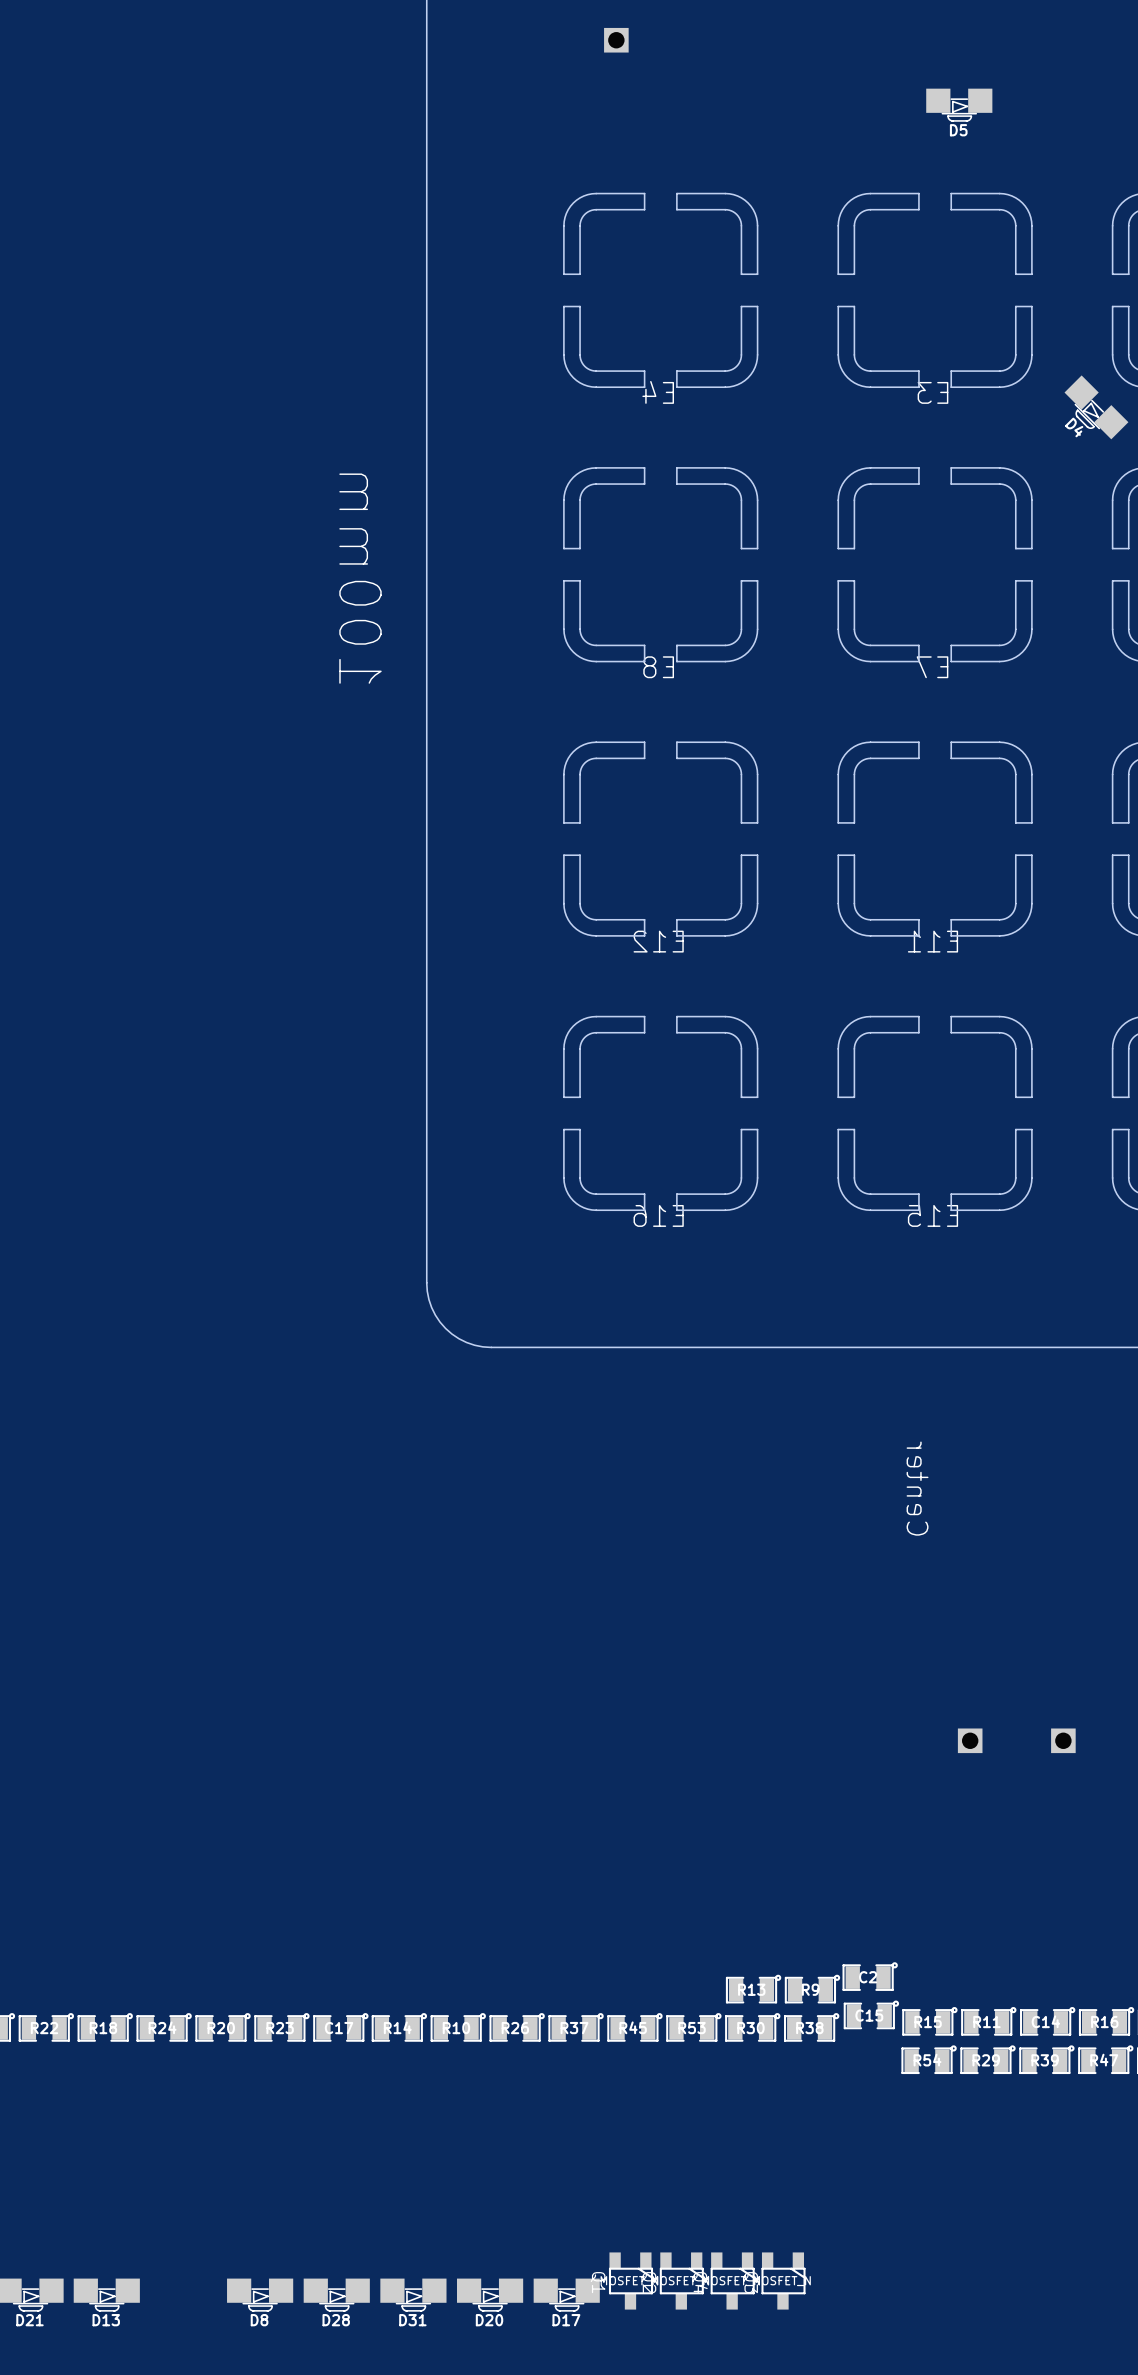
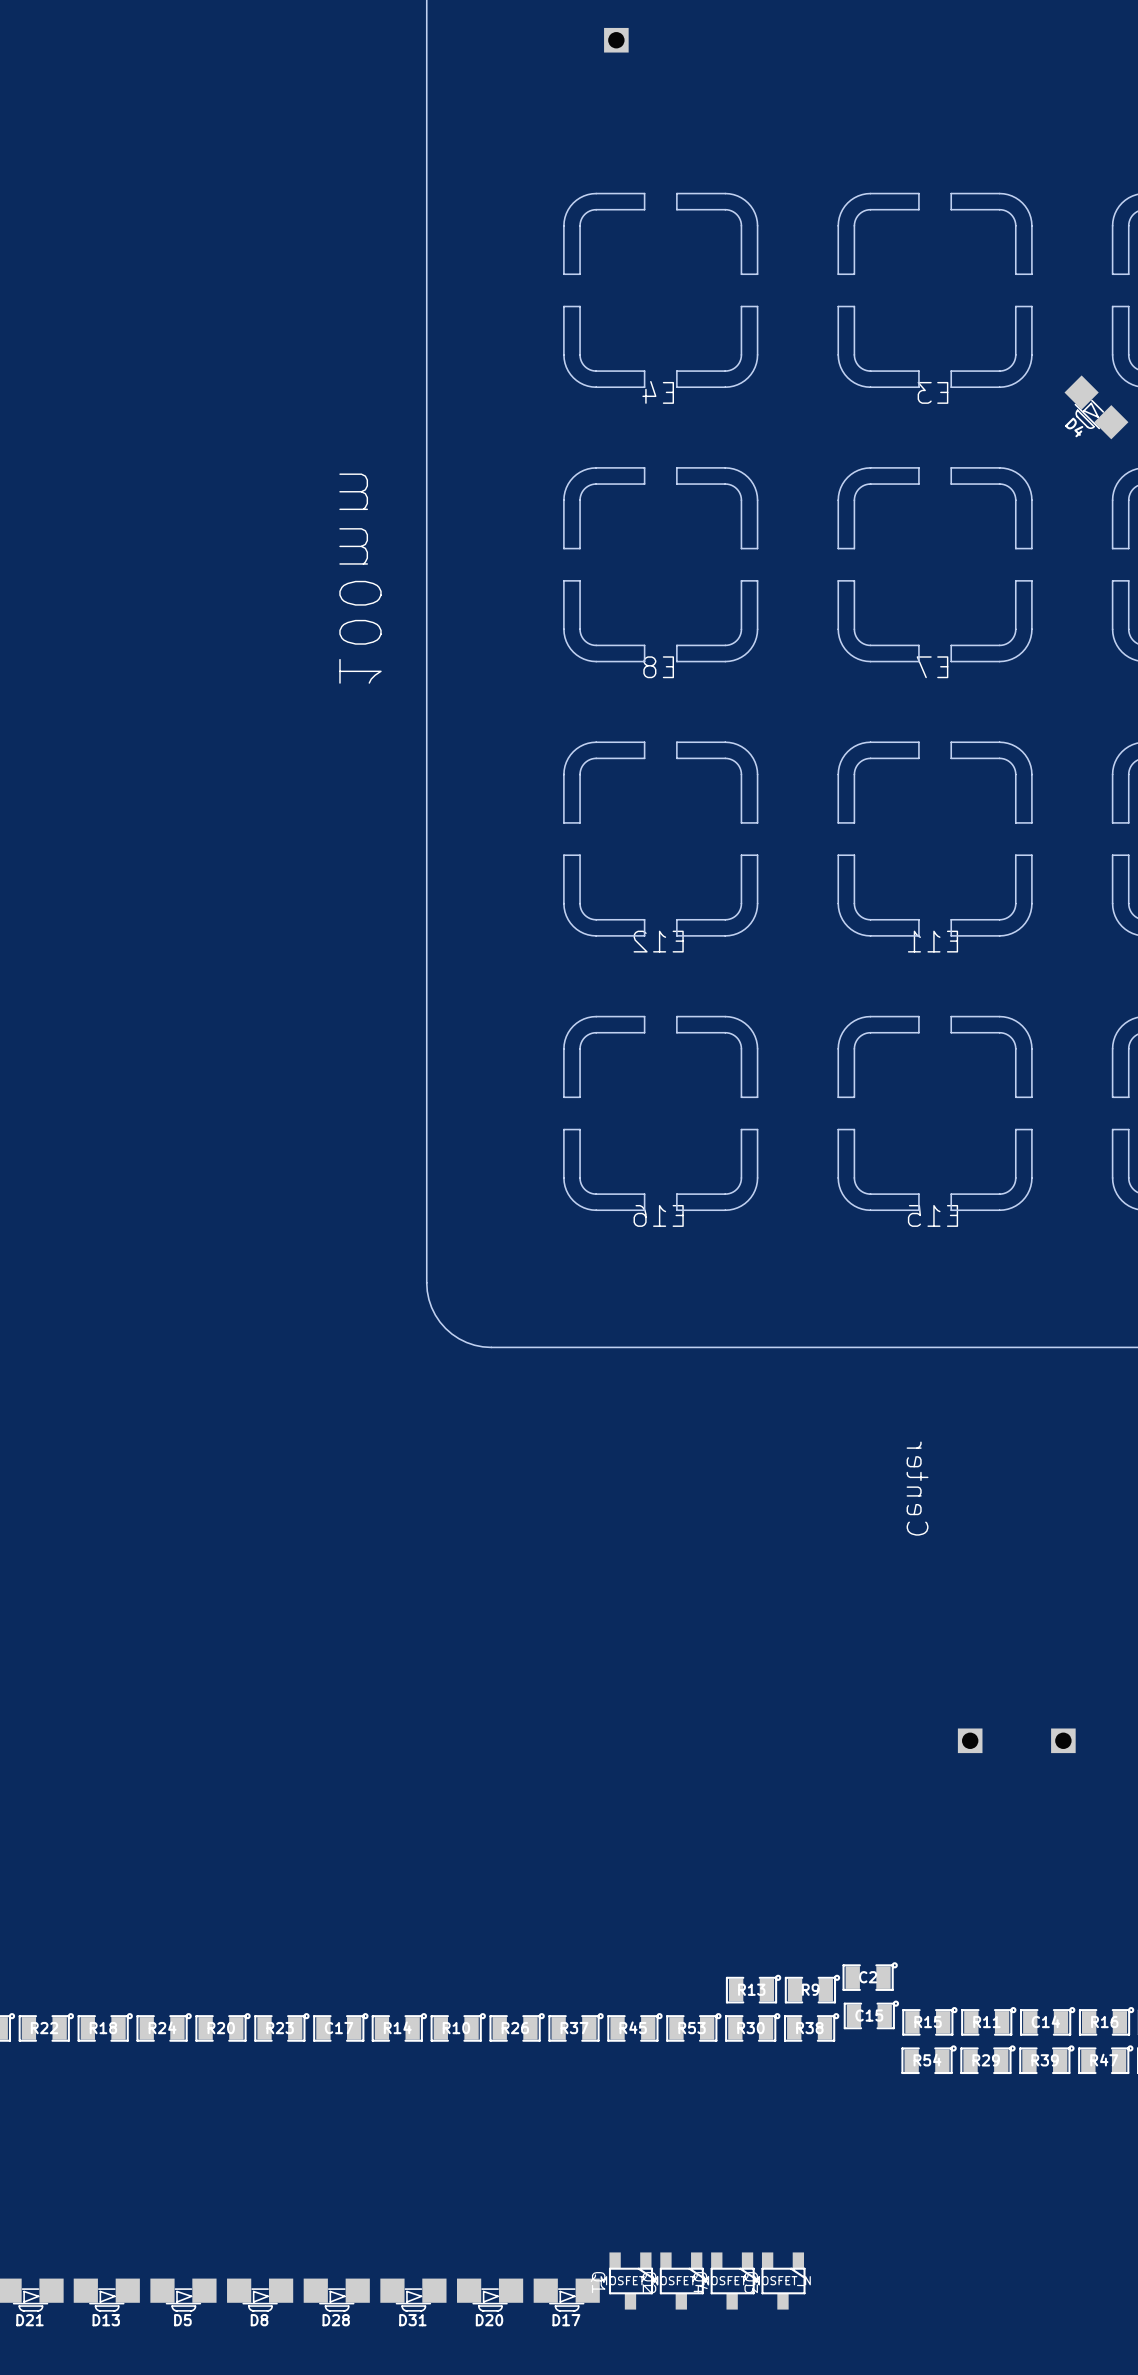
D5 position: (959, 105) -> (183, 2295)

